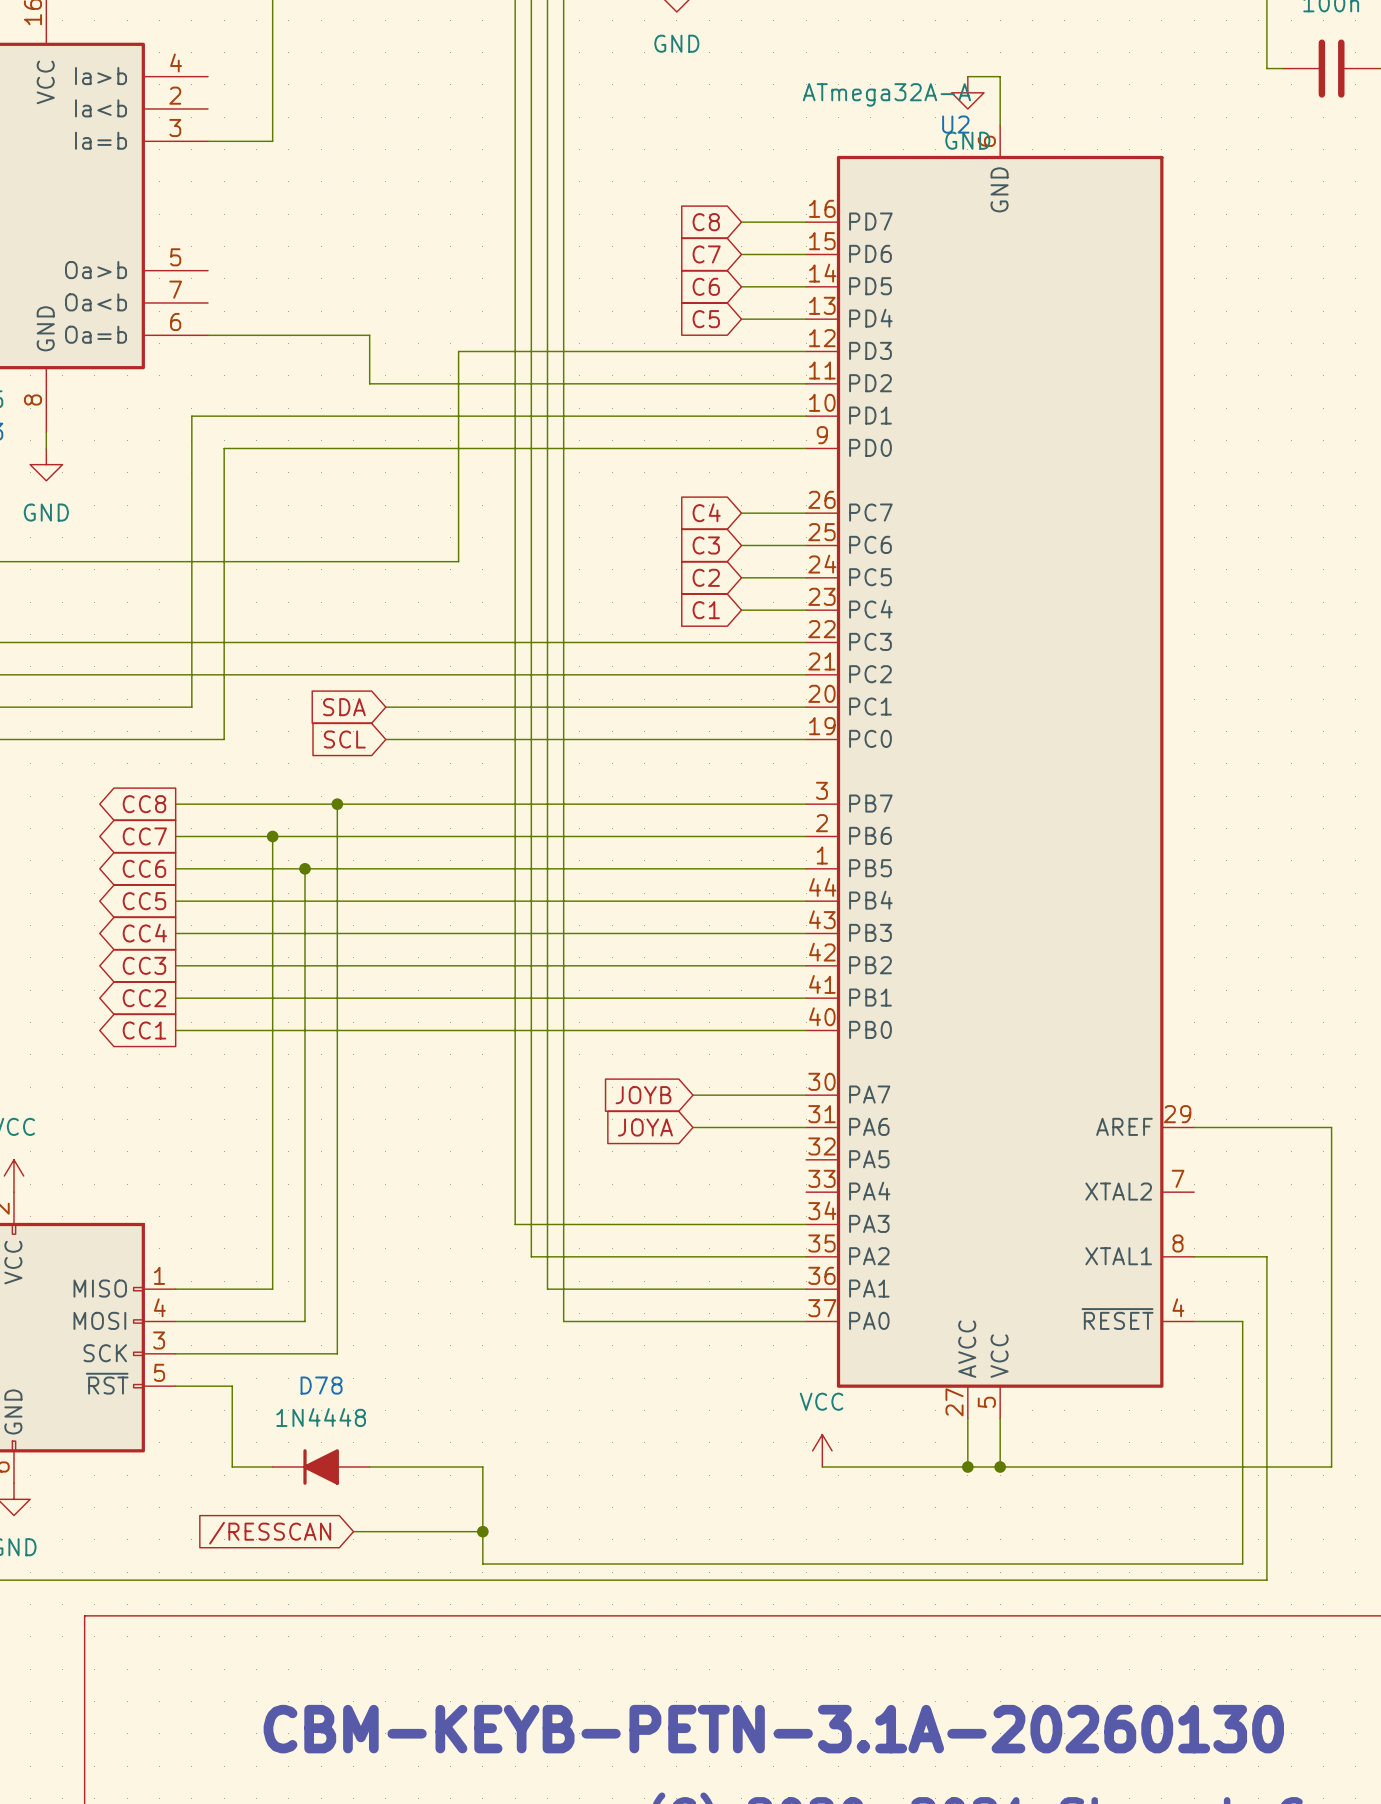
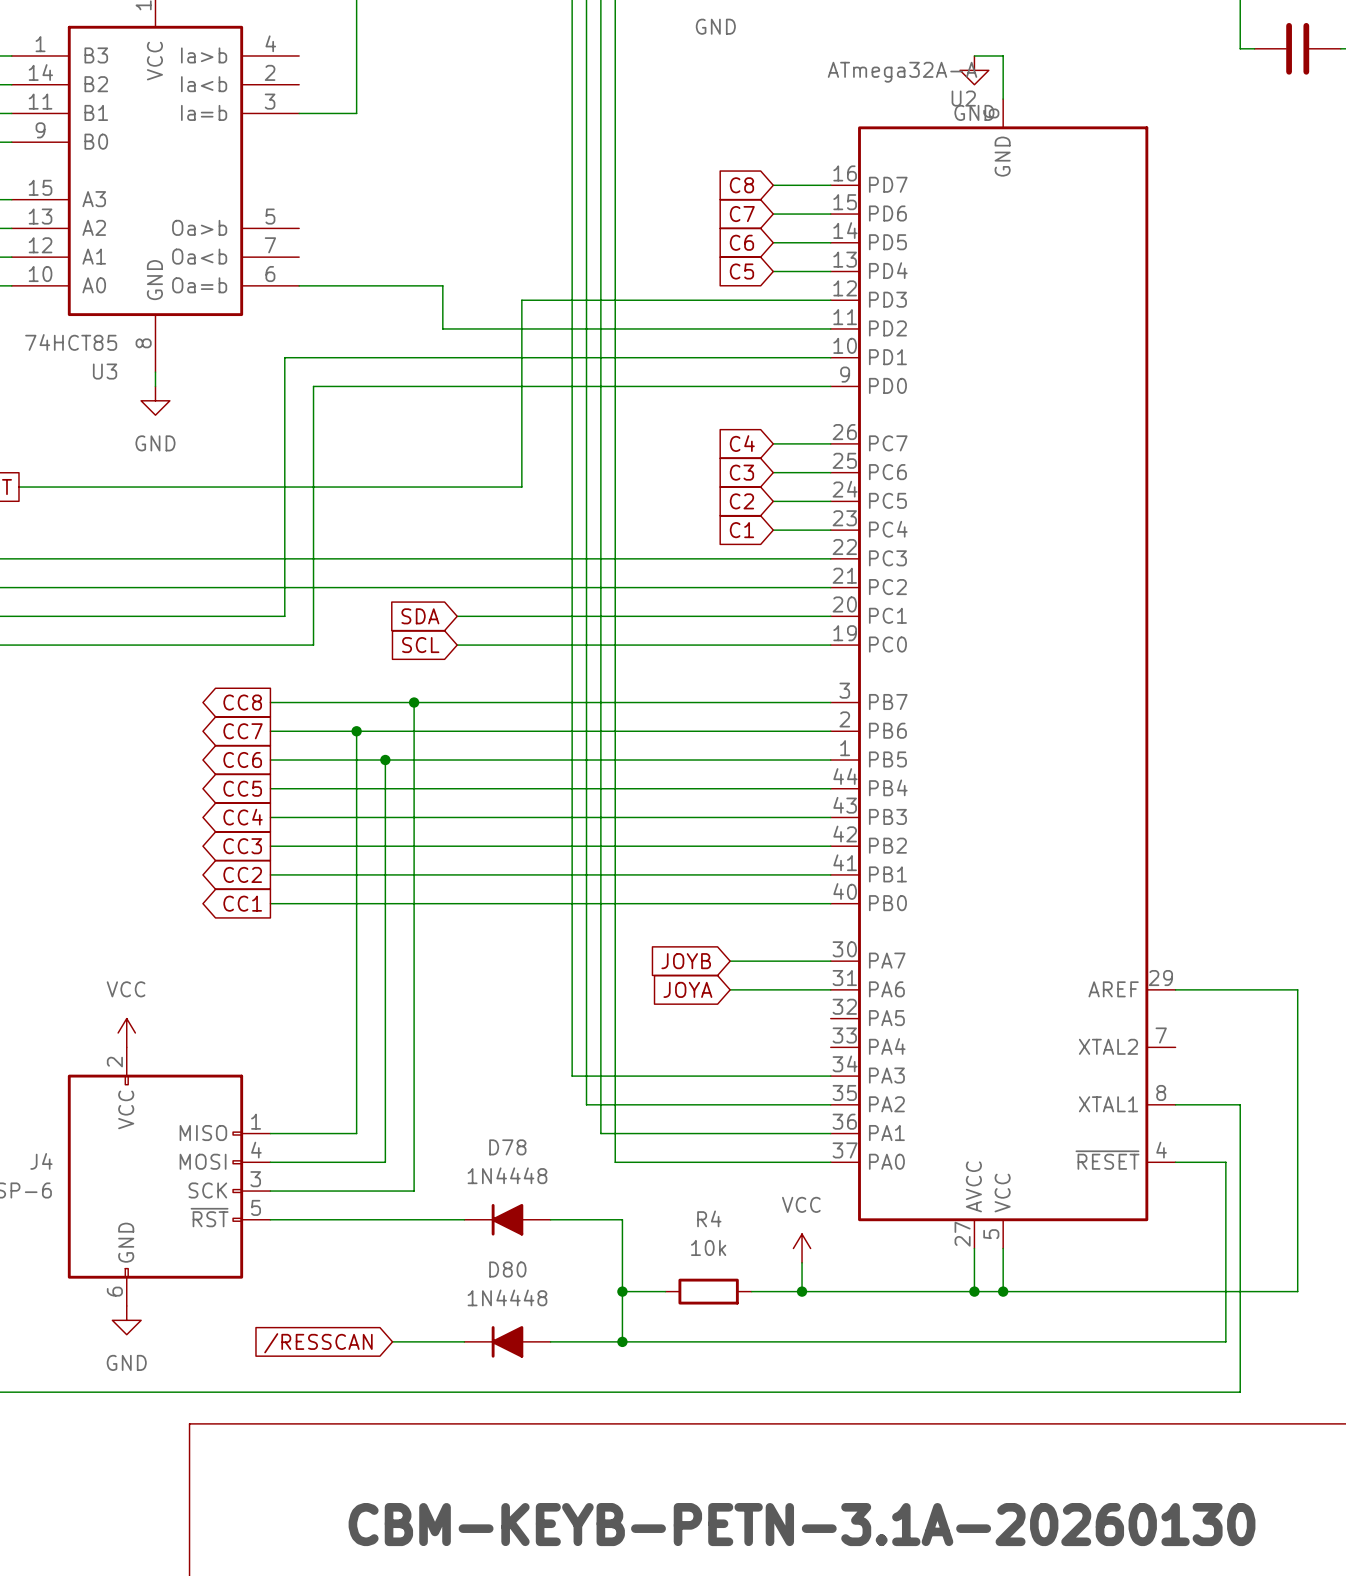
wire: (1242, 1321) (1242, 1563) (482, 1563) (482, 1466) (369, 1466) -> (1218, 1162) (1225, 1162) (1225, 1341) (550, 1341)
wire: (232, 1386) (232, 1466) (272, 1466) -> (320, 1219) (464, 1219)
wire: none -> (550, 1219) (622, 1219) (622, 1341)
wire: none -> (802, 1262) (802, 1291)
power symbol position: VCC (822, 1450) -> VCC (802, 1248)
D78 position: (321, 1466) -> (507, 1219)
wire: none -> (622, 1291) (665, 1291)
junction: none -> (622, 1291)
R4: none -> 10k (708, 1291)
wire: none -> (751, 1291) (845, 1291)
junction: none -> (802, 1291)
wire: none -> (392, 1341) (464, 1341)
D80: none -> 1N4448 (507, 1341)
junction: none -> (622, 1341)
wire: (353, 1531) (482, 1531) -> none
junction: (482, 1531) -> none
global label position: /RESSCAN (270, 1533) -> /RESSCAN (318, 1343)

